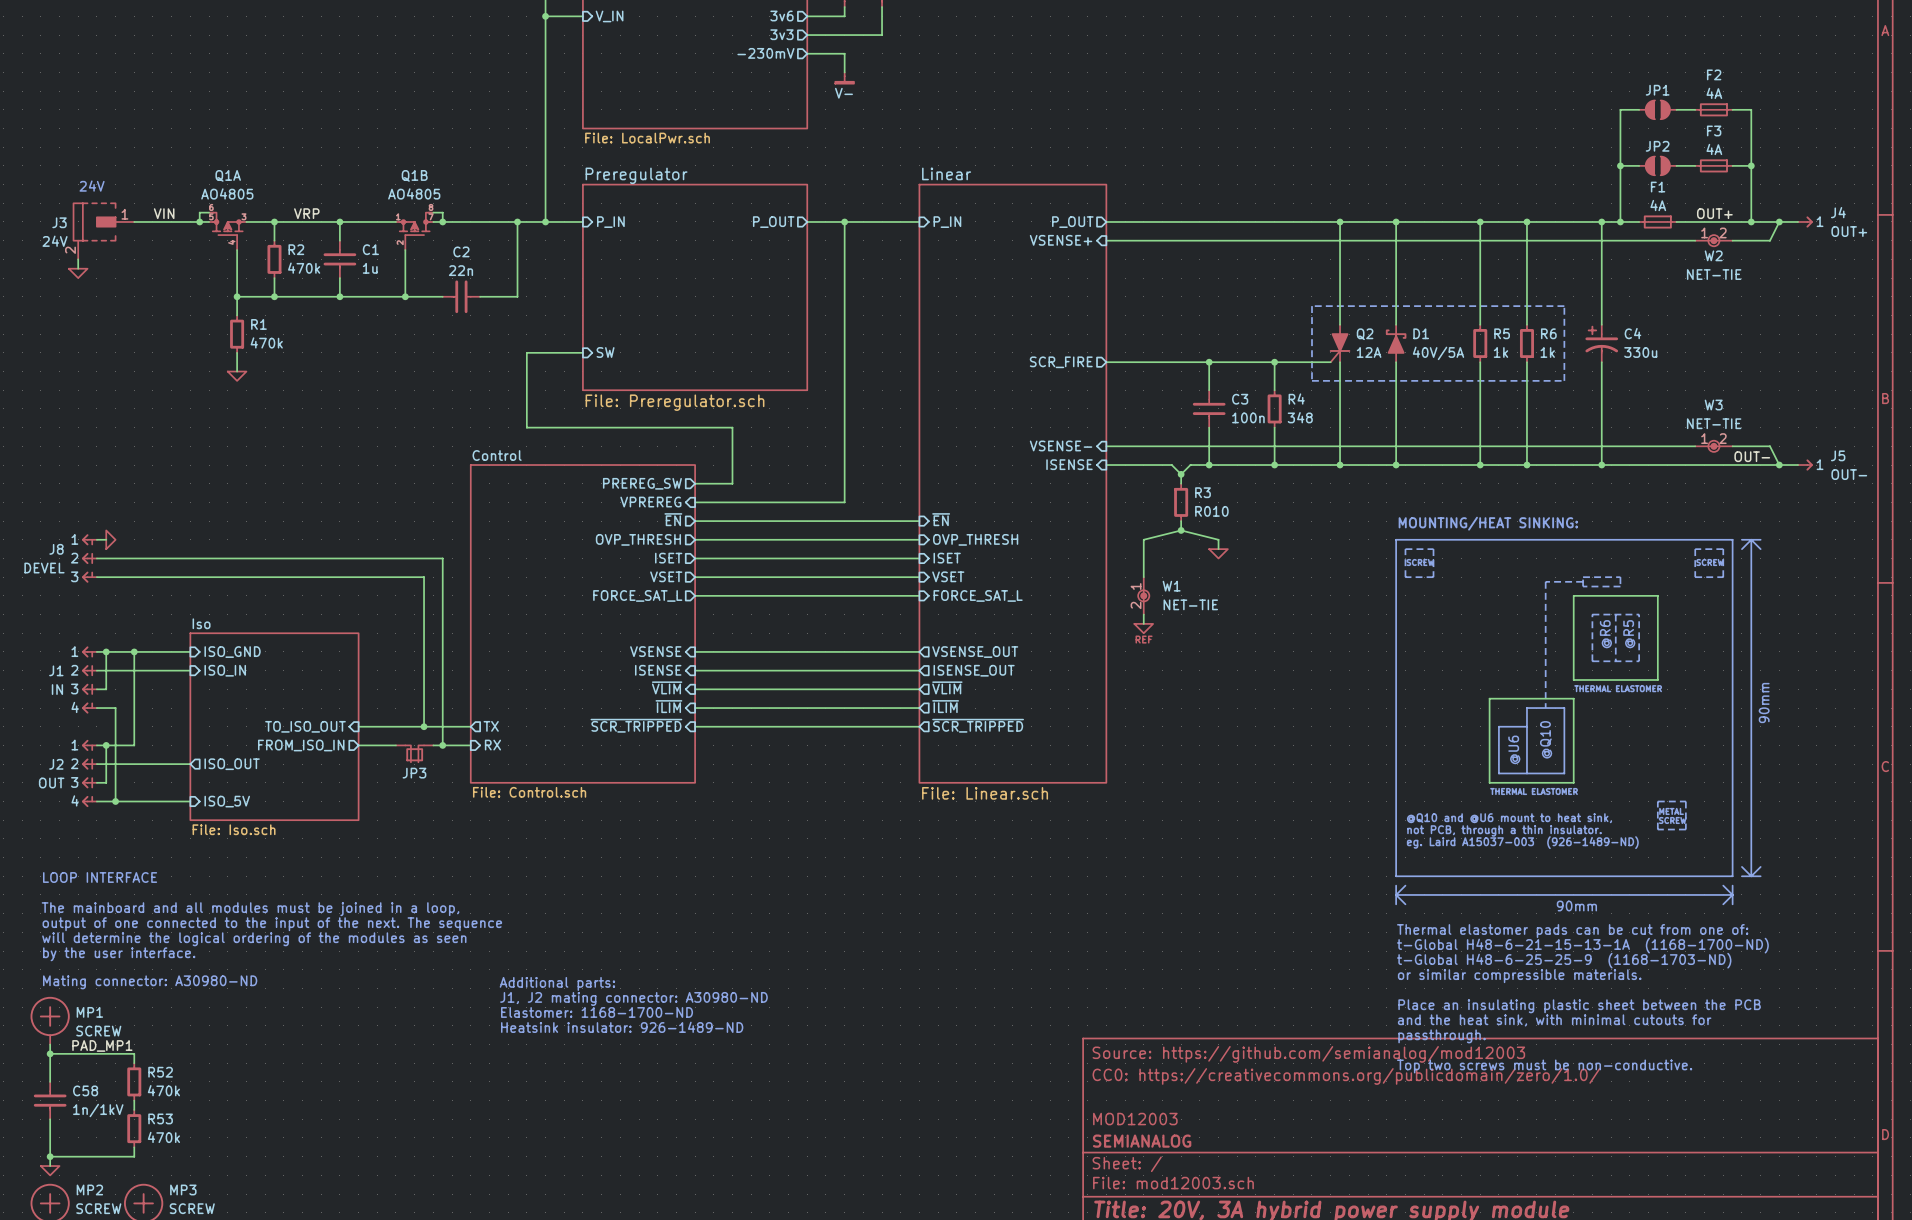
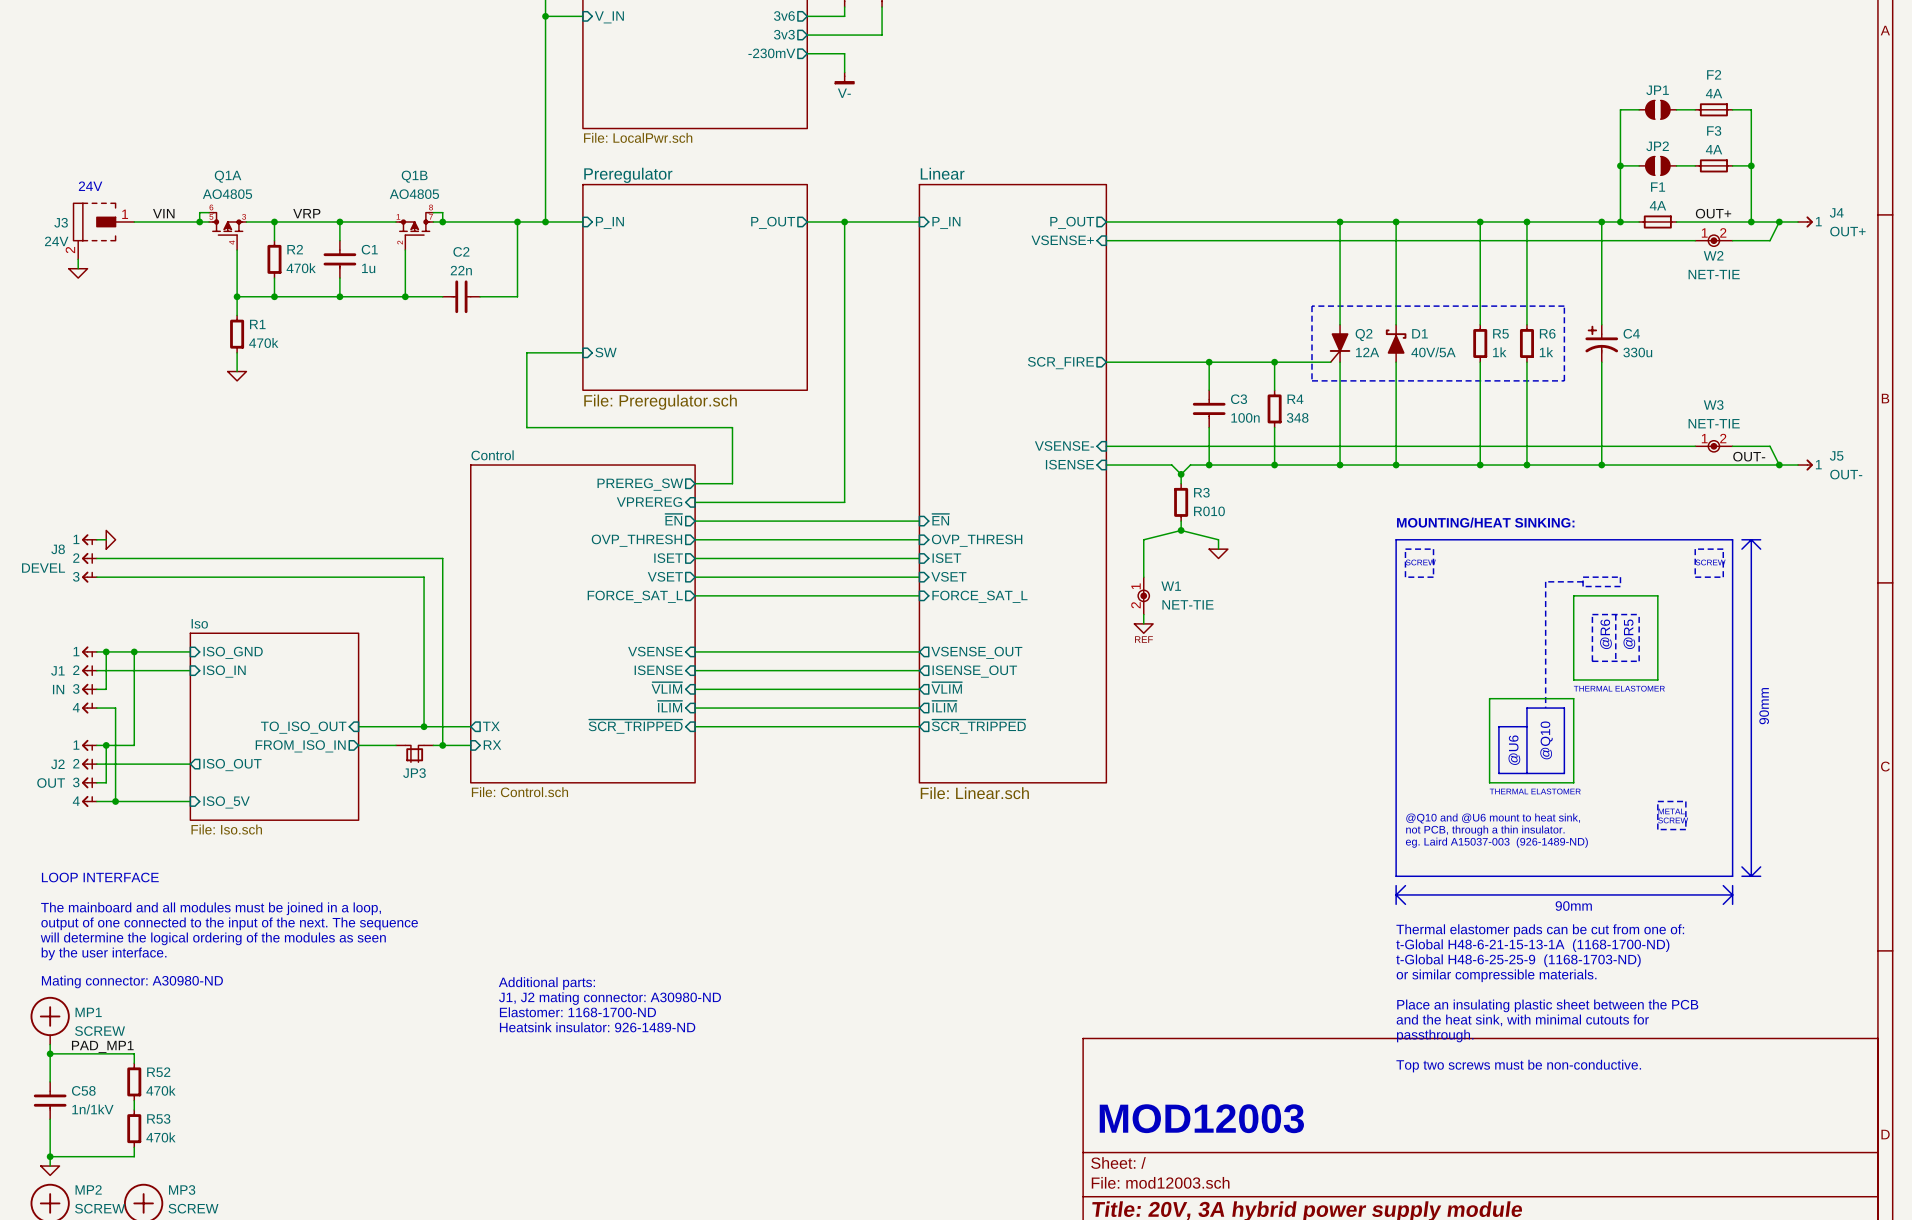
title block: Source: https://github.com/semianalog/mod12003 (1308, 1054) -> none
title block: CC0: https://creativecommons.org/publicdomain/zero/1.0/ (1346, 1076) -> none
text: none -> MOD12003 (1201, 1118)
title block: MOD12003 (1135, 1119) -> none
title block: SEMIANALOG (1142, 1141) -> none

